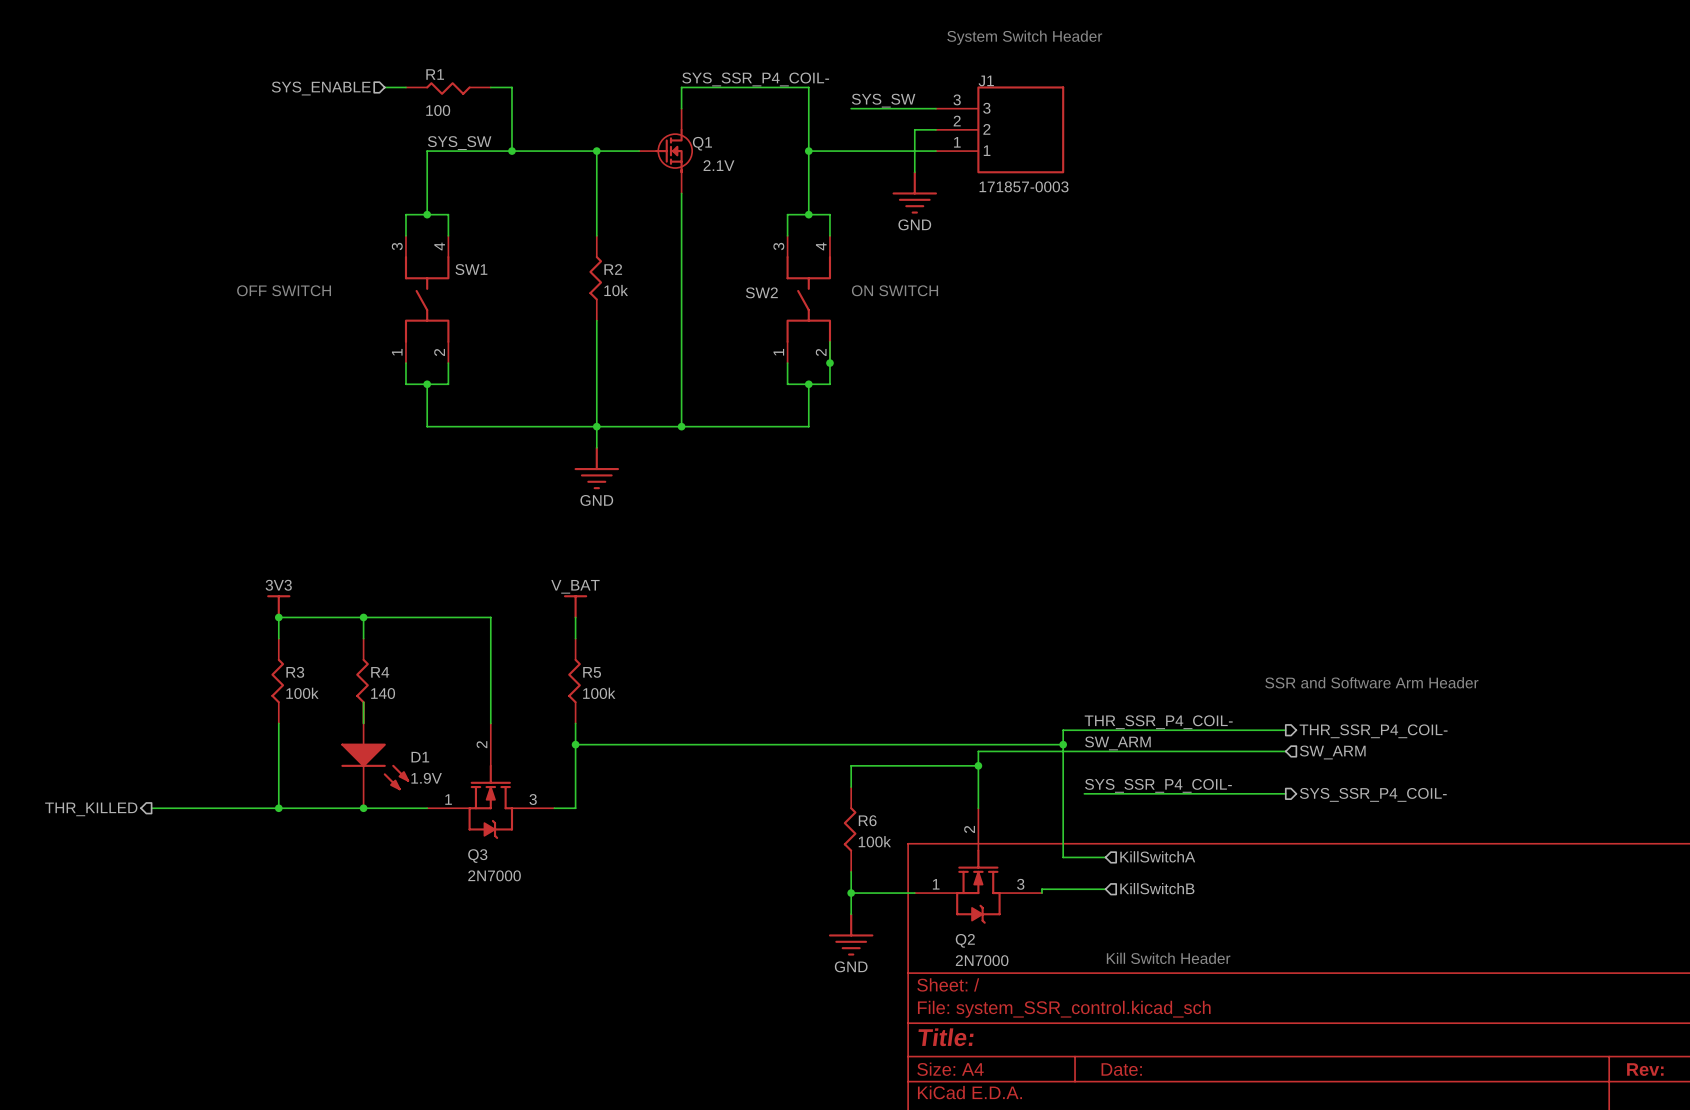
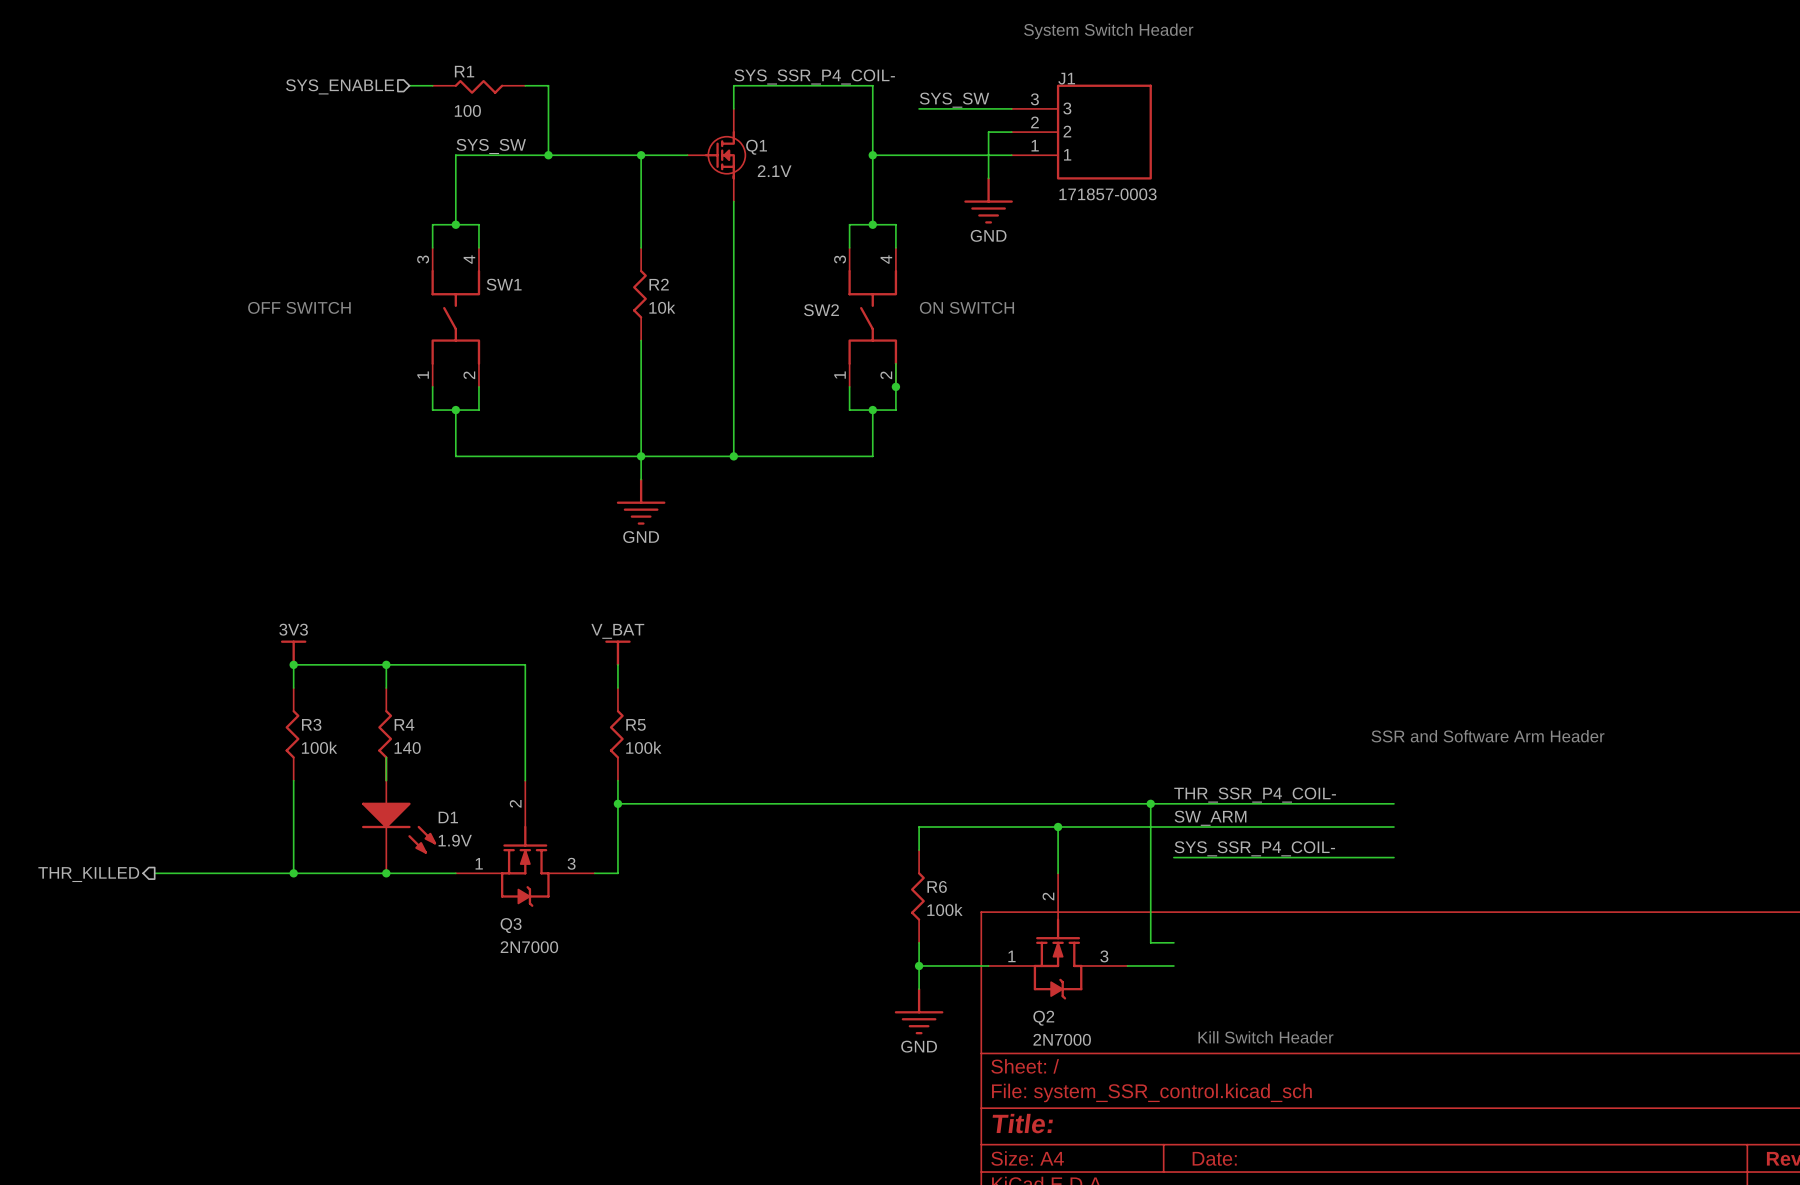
label position: THR_SSR_P4_COIL- (1158, 722) -> THR_SSR_P4_COIL- (1255, 795)
wire: (1285, 730) (1063, 730) (1063, 744) -> (1393, 803) (1150, 803)
hierarchical label: THR_SSR_P4_COIL- (1373, 731) -> none
label position: SW_ARM (1117, 743) -> SW_ARM (1210, 818)
wire: (1285, 751) (978, 751) (978, 765) -> (1393, 827) (1058, 827)
hierarchical label: SW_ARM (1332, 752) -> none
hierarchical label: SYS_SSR_P4_COIL- (1373, 794) -> none
hierarchical label: KillSwitchA (1157, 856) -> none
wire: (1063, 857) (1105, 857) -> (1150, 927) (1150, 942) (1173, 942)
hierarchical label: KillSwitchB (1157, 888) -> none
wire: (1105, 889) (1041, 889) (1041, 893) -> (1173, 965) (1127, 965)

